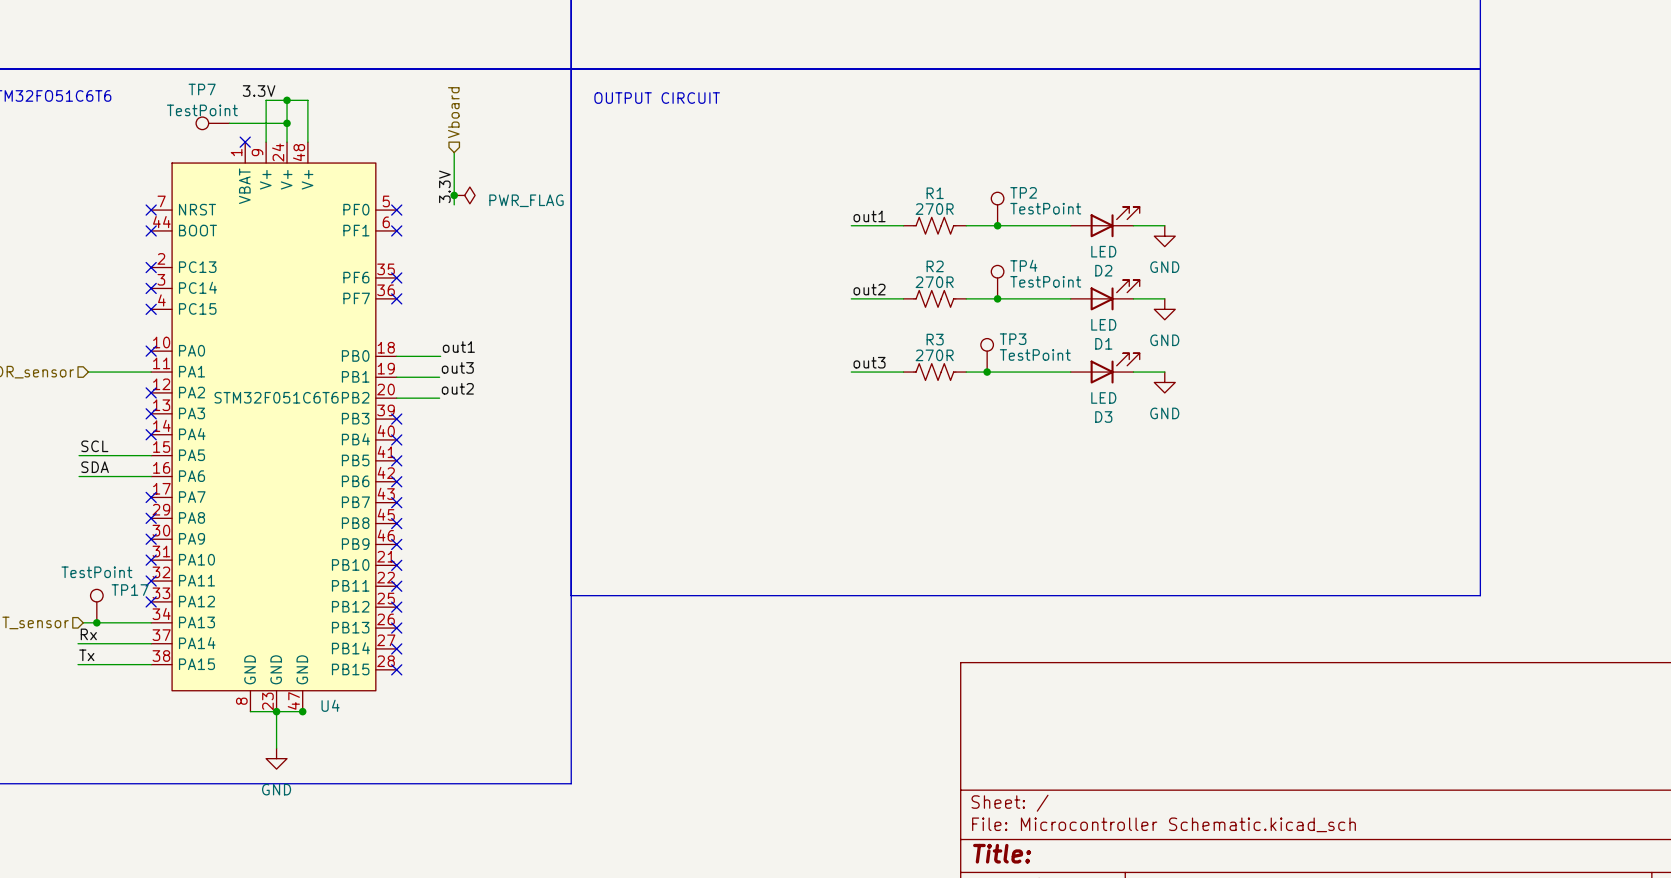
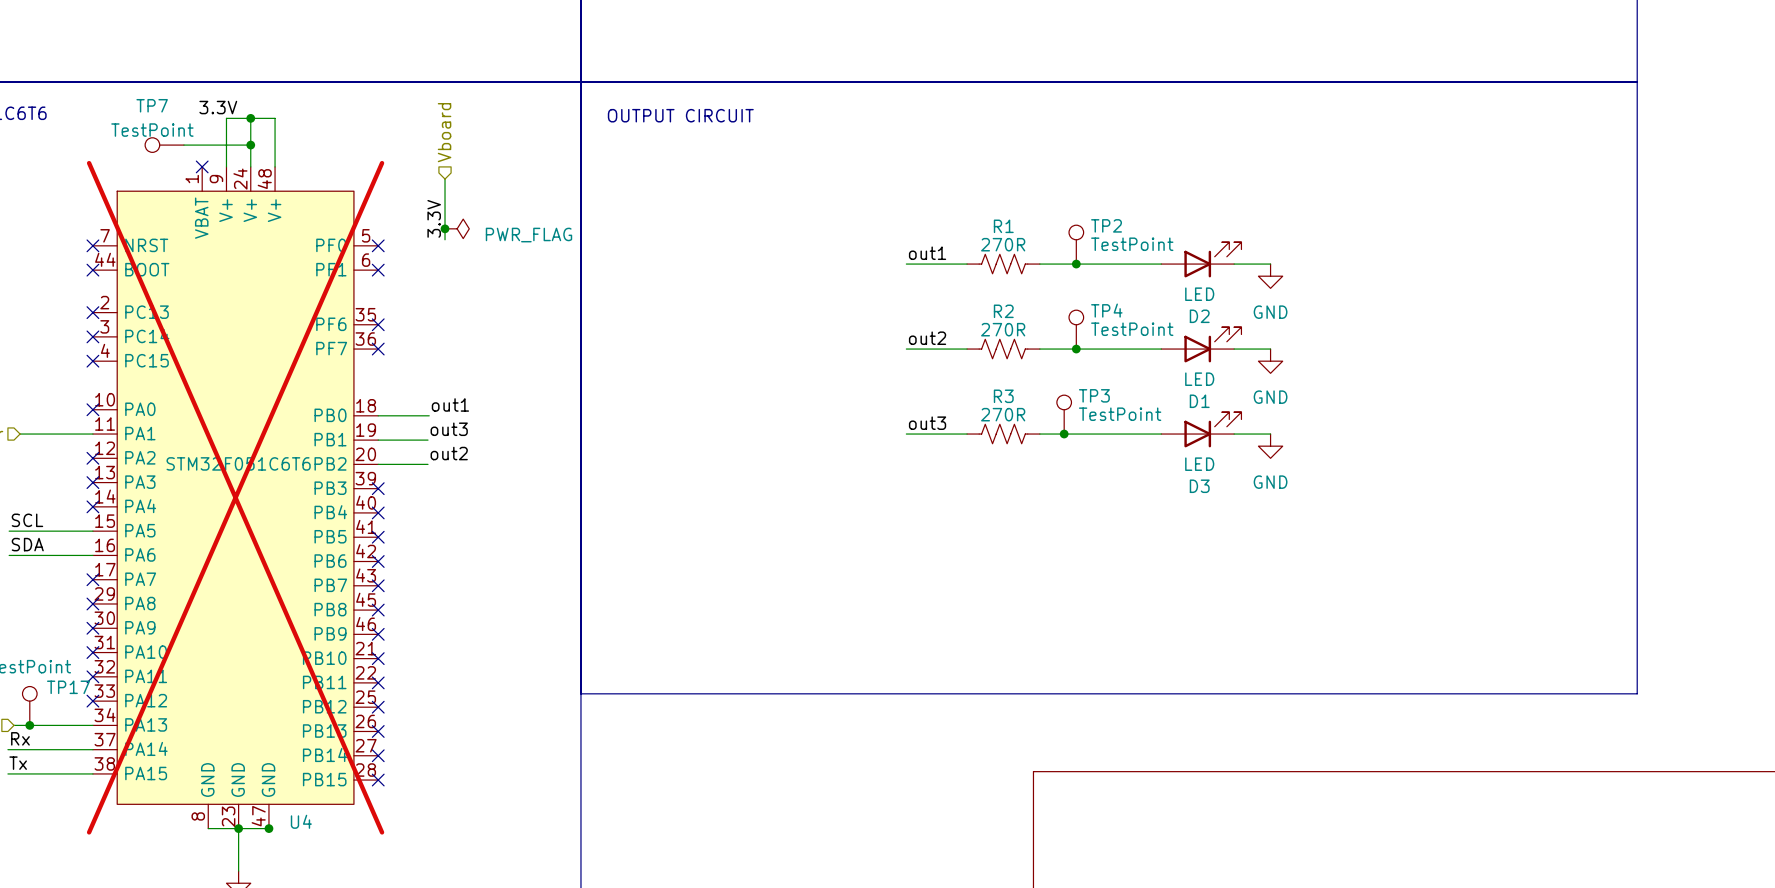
U4 do-not-place cross: none -> (235, 497)

